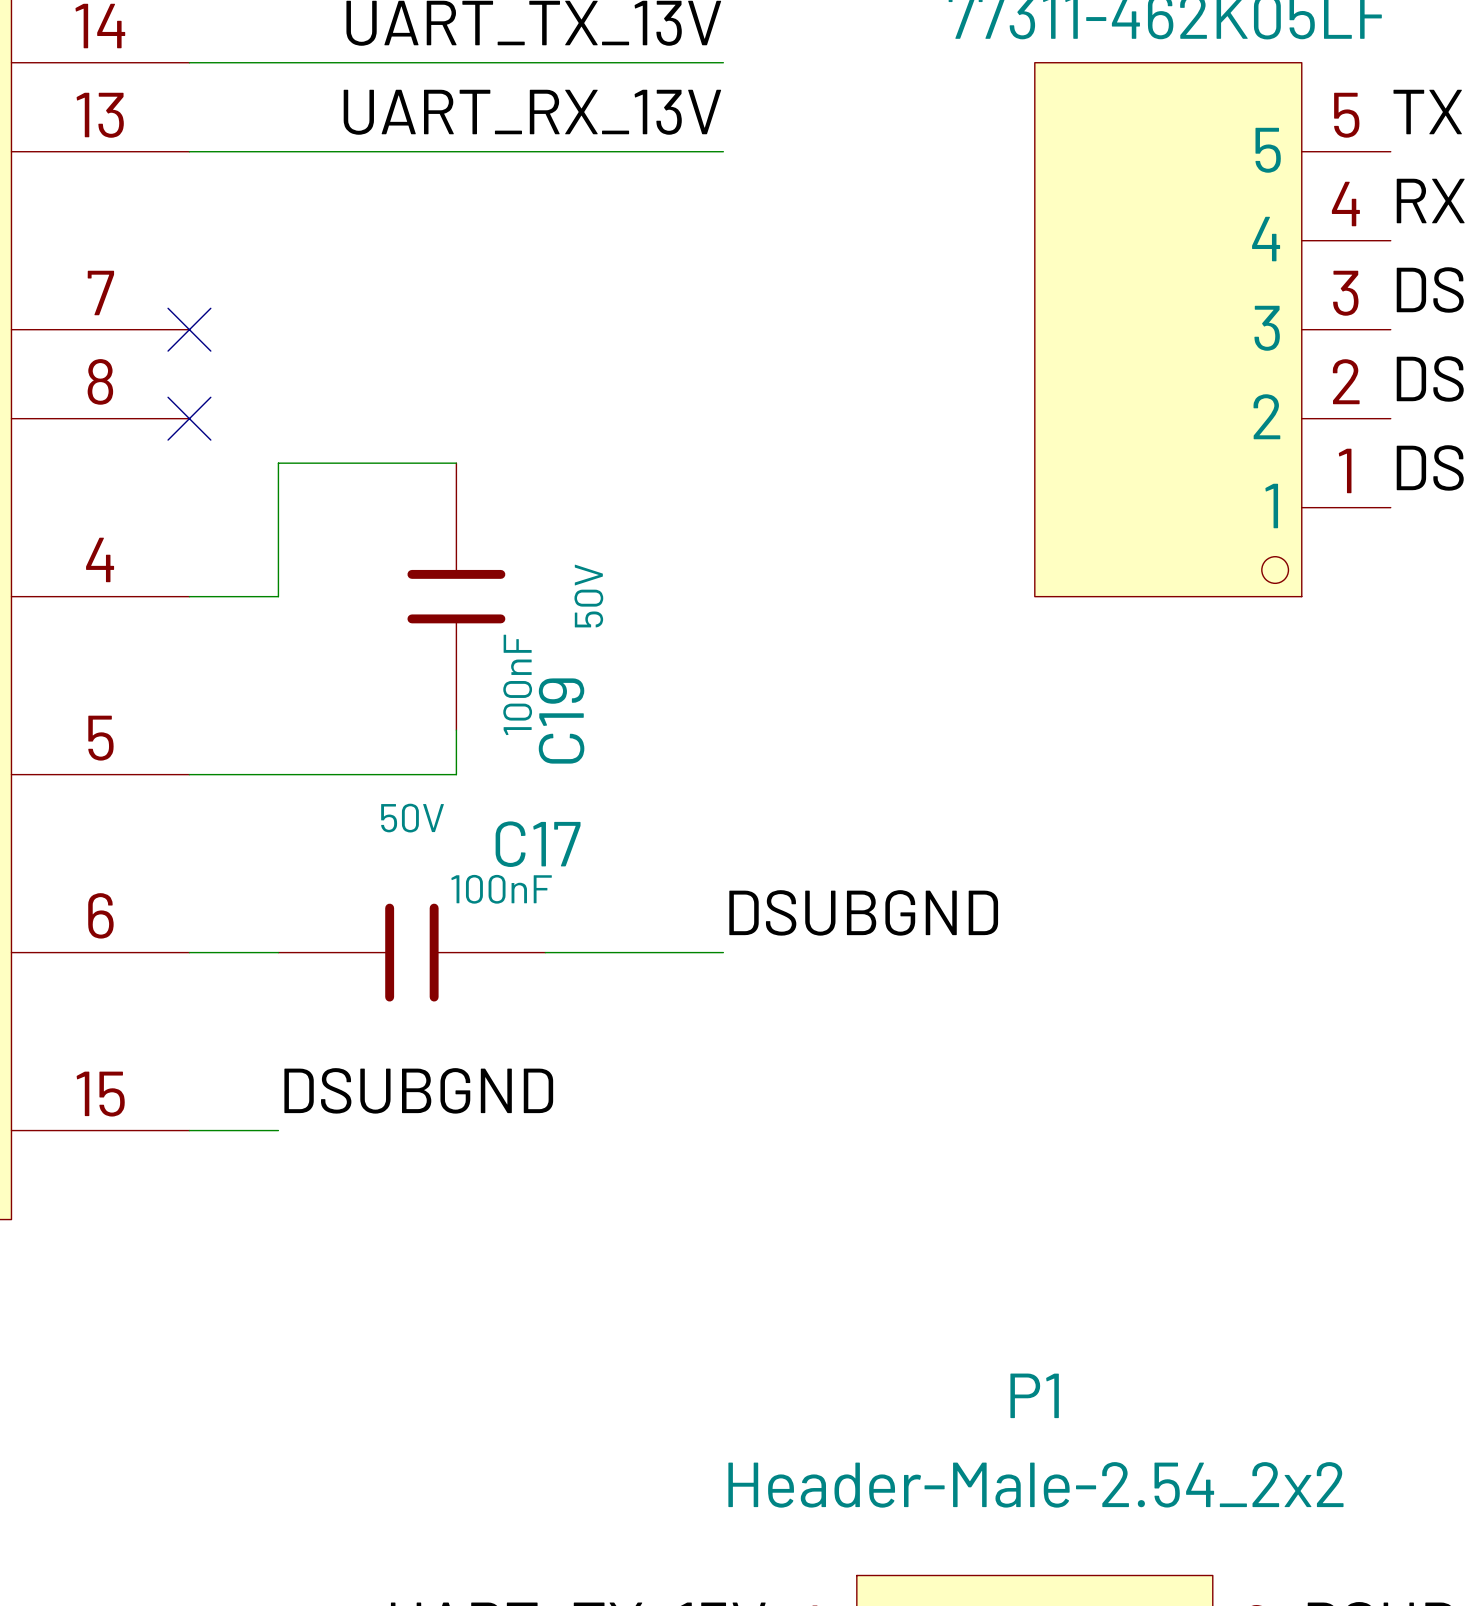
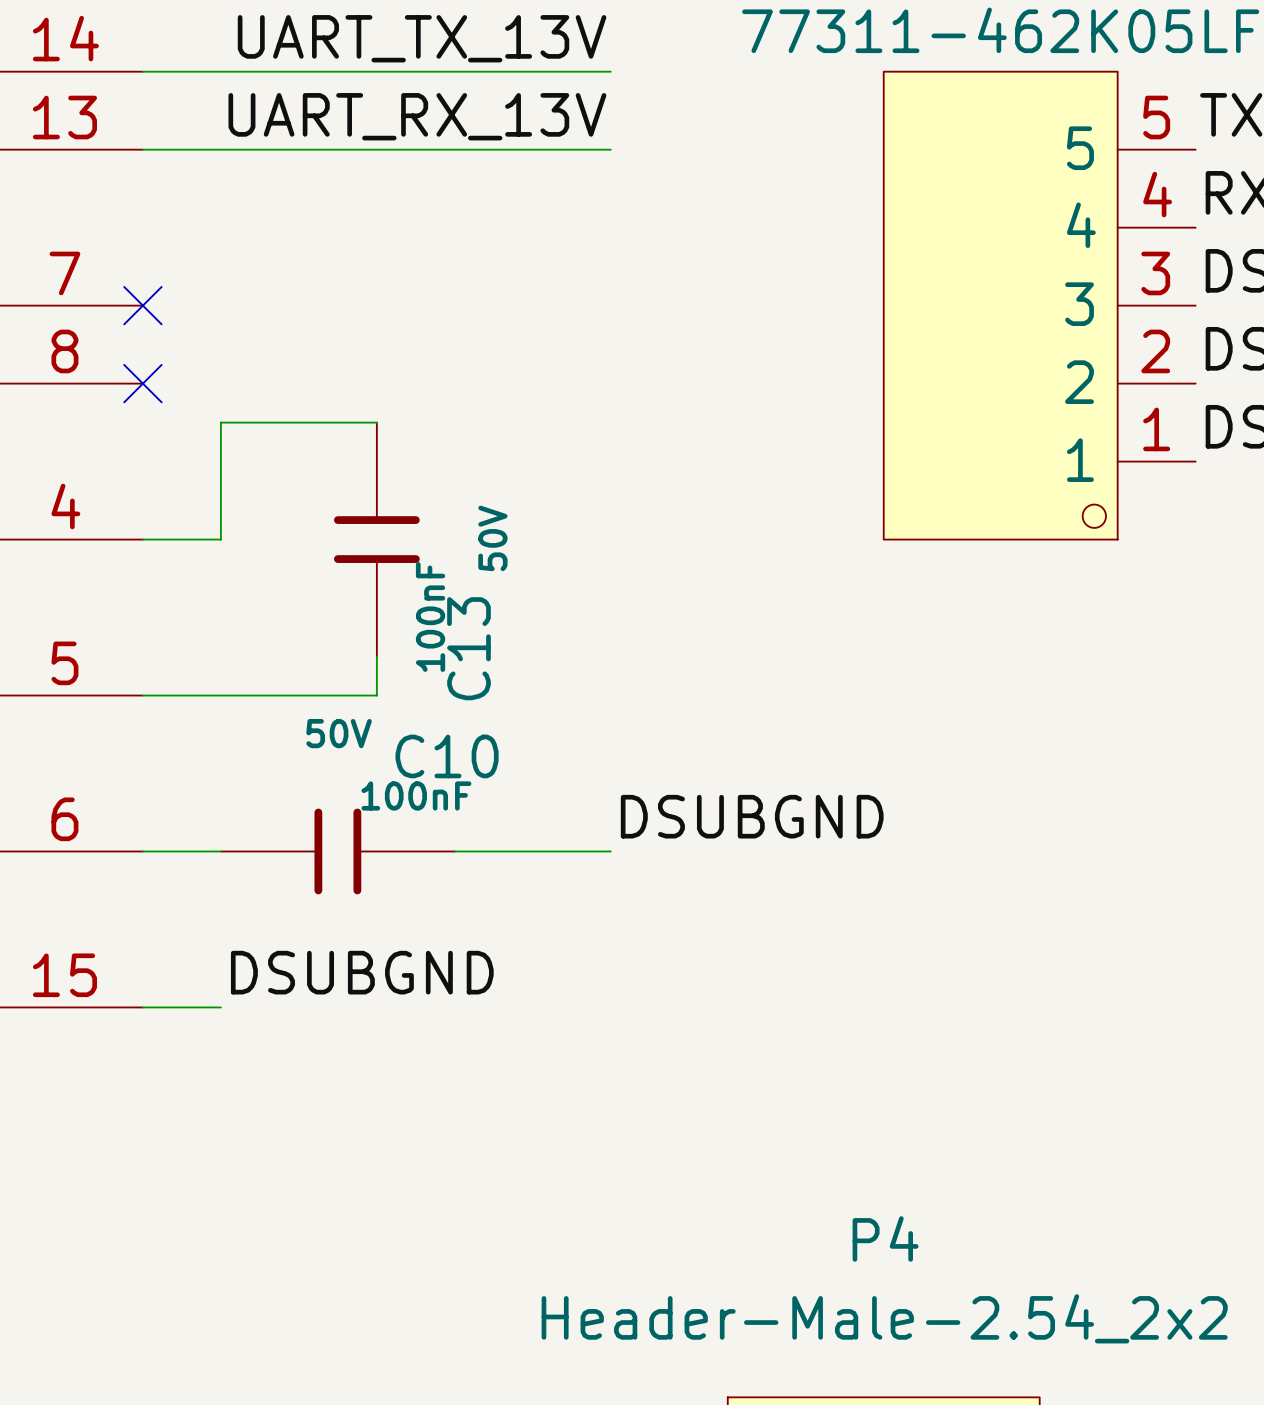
C19 name: C19 (561, 721) -> C13 (468, 648)
C17 name: C17 (538, 844) -> C10 (447, 756)
P1 name: P1 (1034, 1395) -> P4 (885, 1238)

